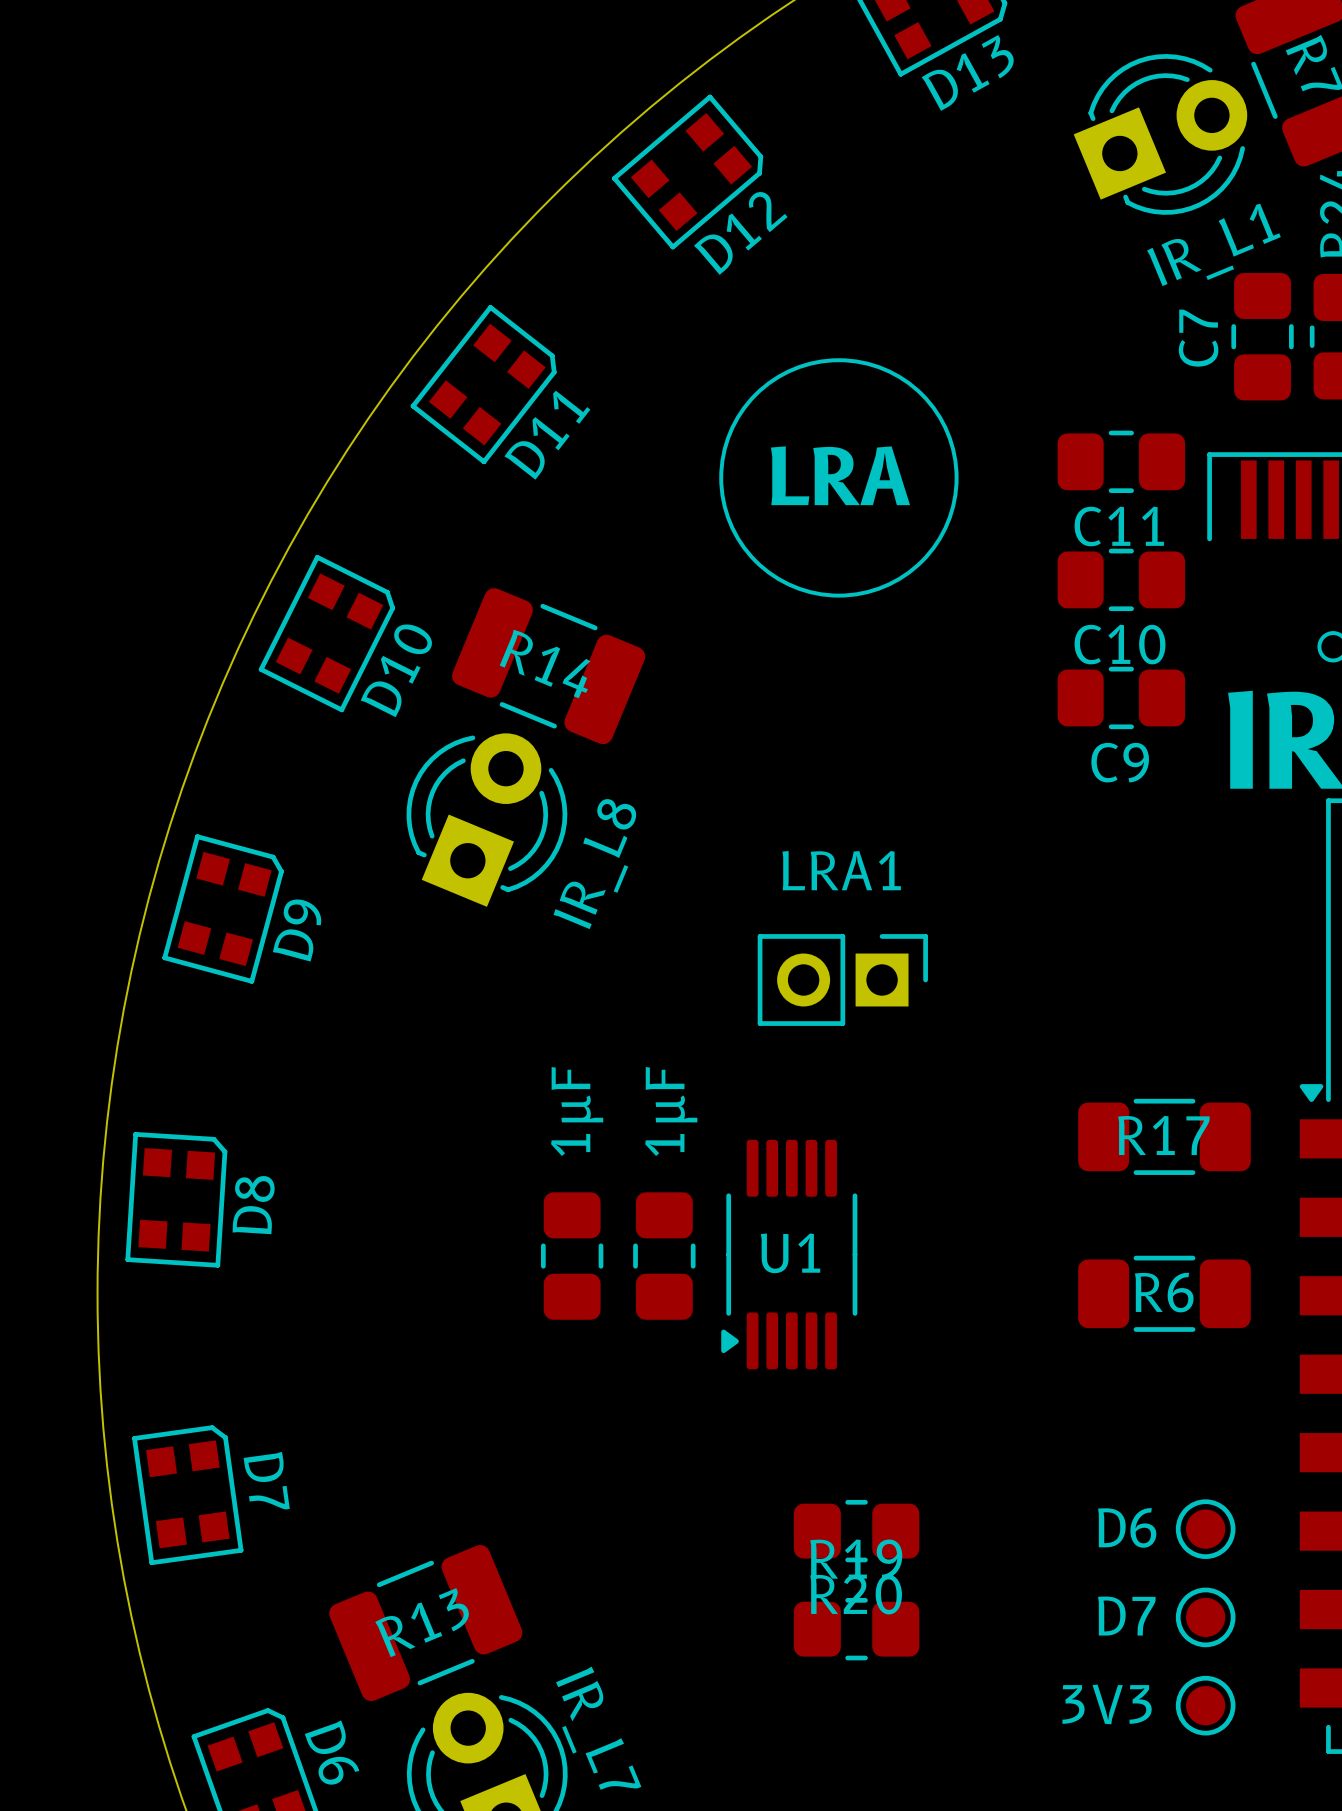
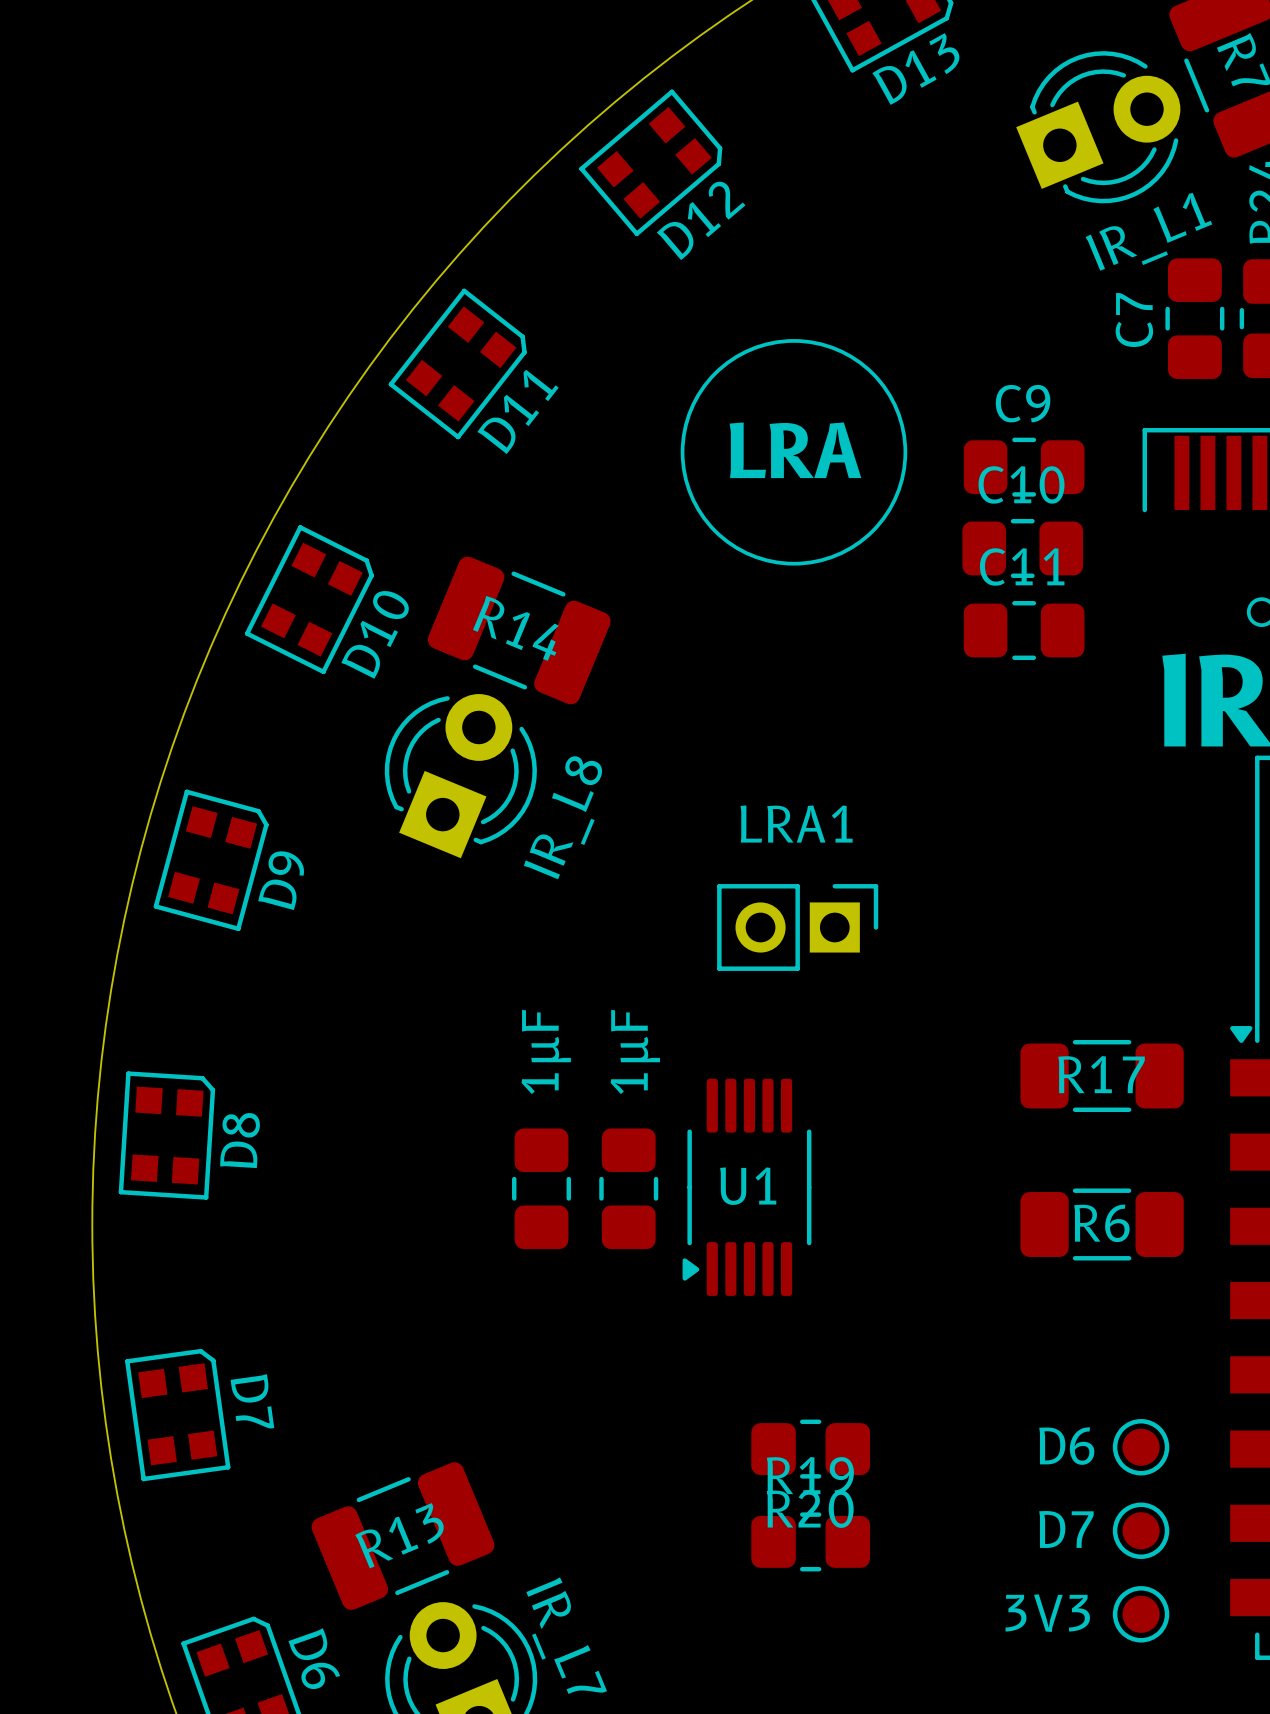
C11 position: (1121, 461) -> (1024, 630)
C11 name position: C11 (1119, 526) -> C11 (1022, 566)
C10 position: (1121, 579) -> (1022, 548)
C10 name position: C10 (1120, 644) -> C10 (1021, 484)
C9 position: (1121, 697) -> (1024, 467)
C9 name position: C9 (1120, 762) -> C9 (1023, 403)

